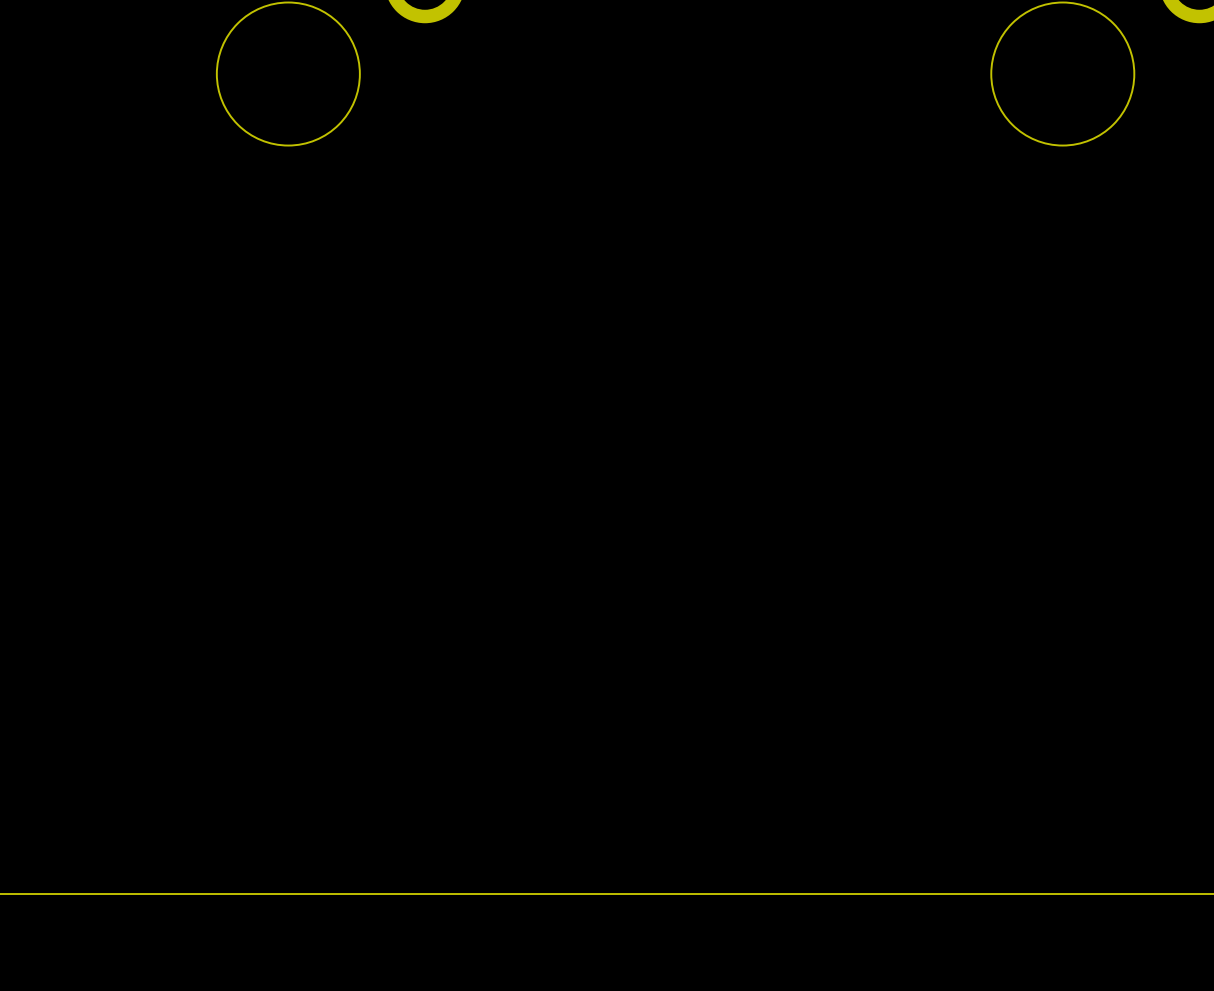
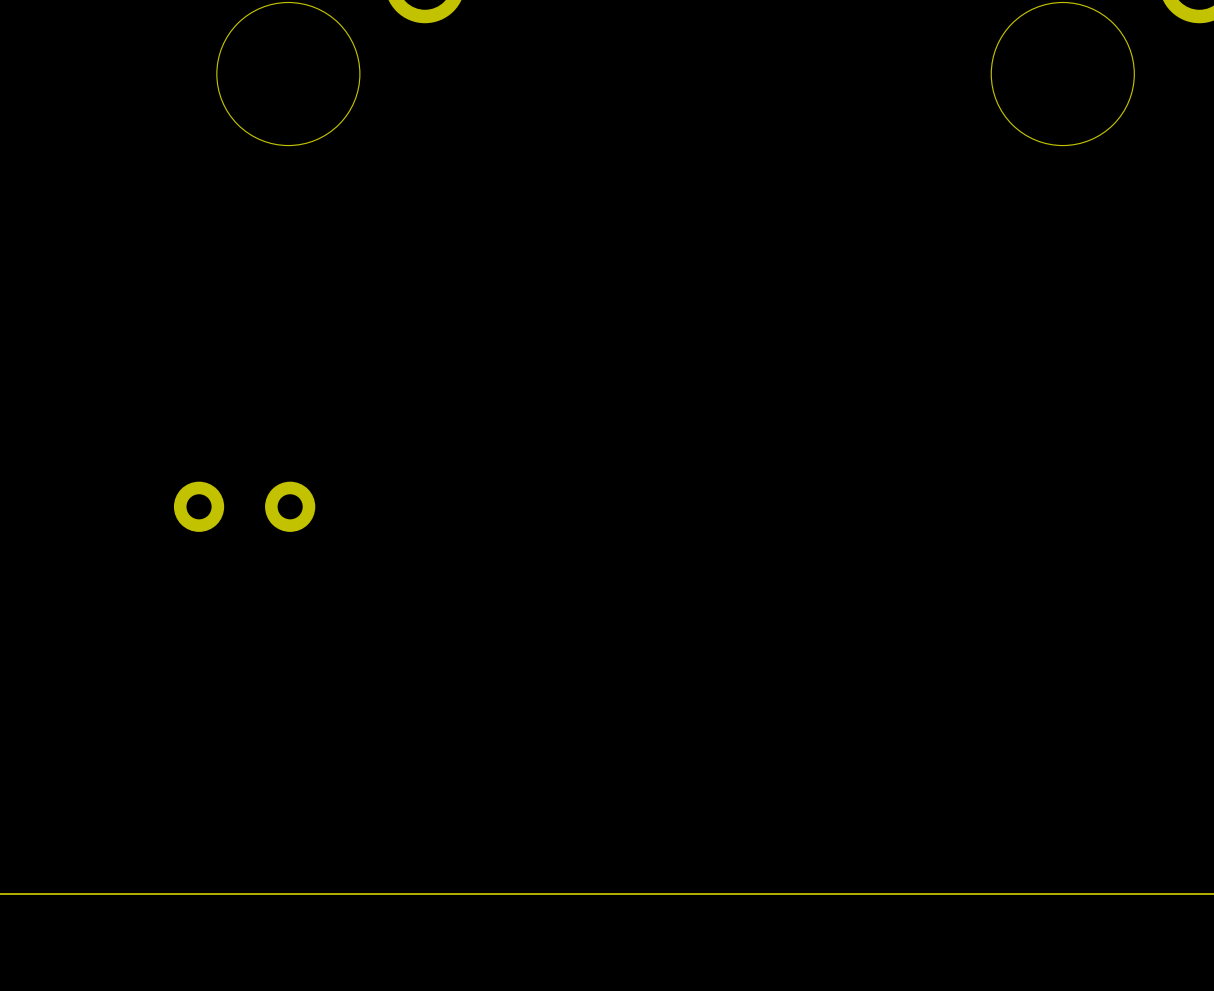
part: none -> (244, 506)

